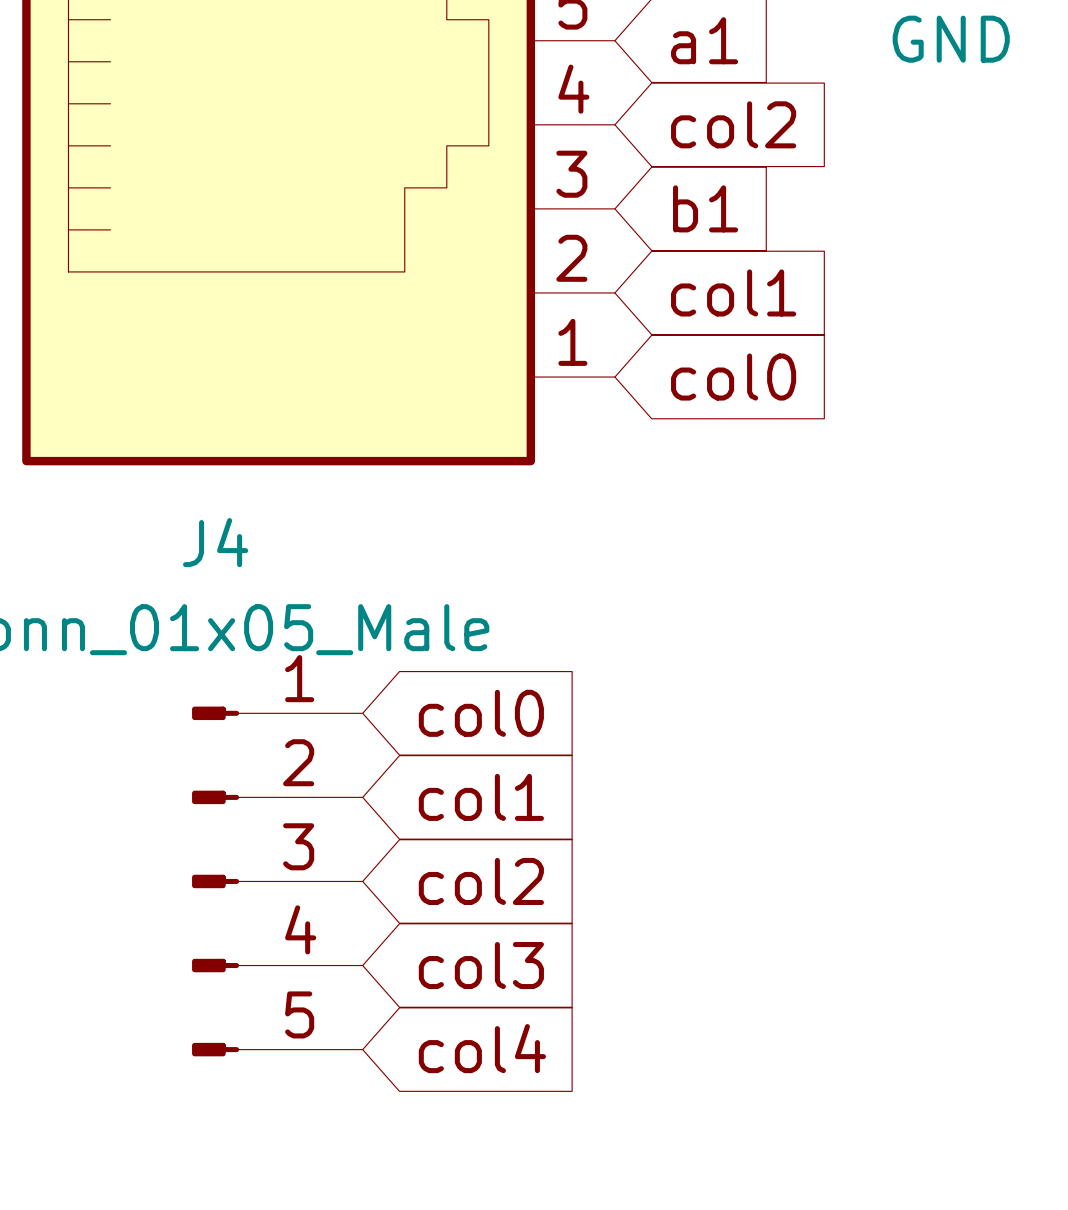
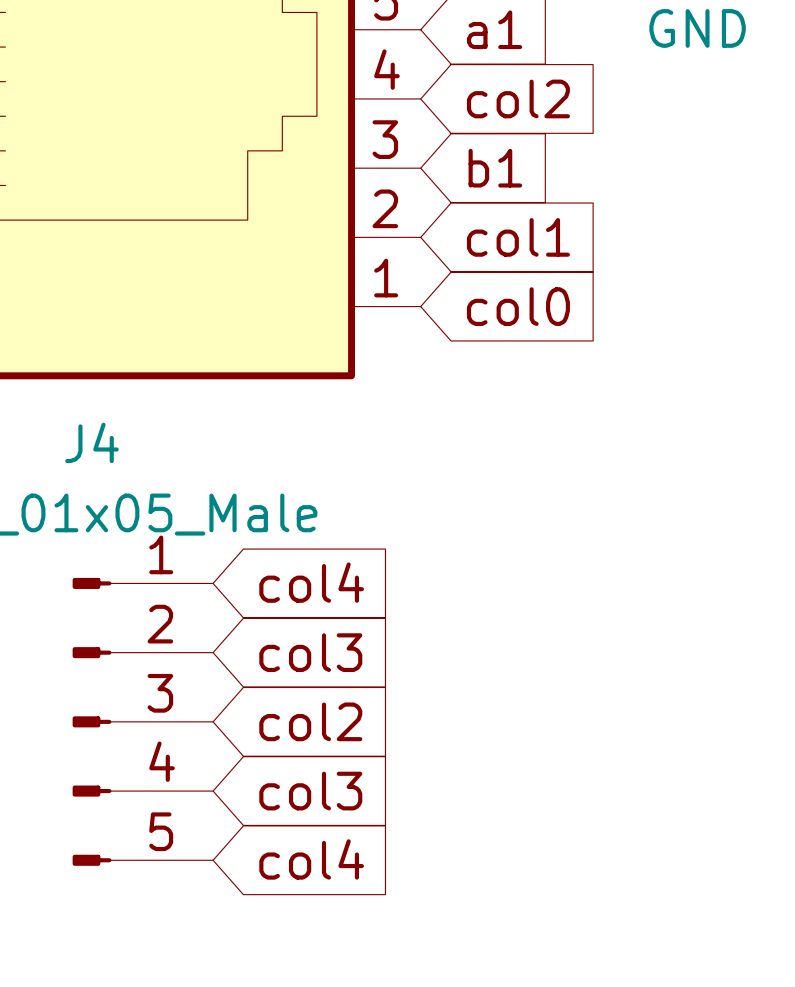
global label: col0 (481, 713) -> col4 (311, 582)
global label: col1 (481, 797) -> col3 (310, 652)

